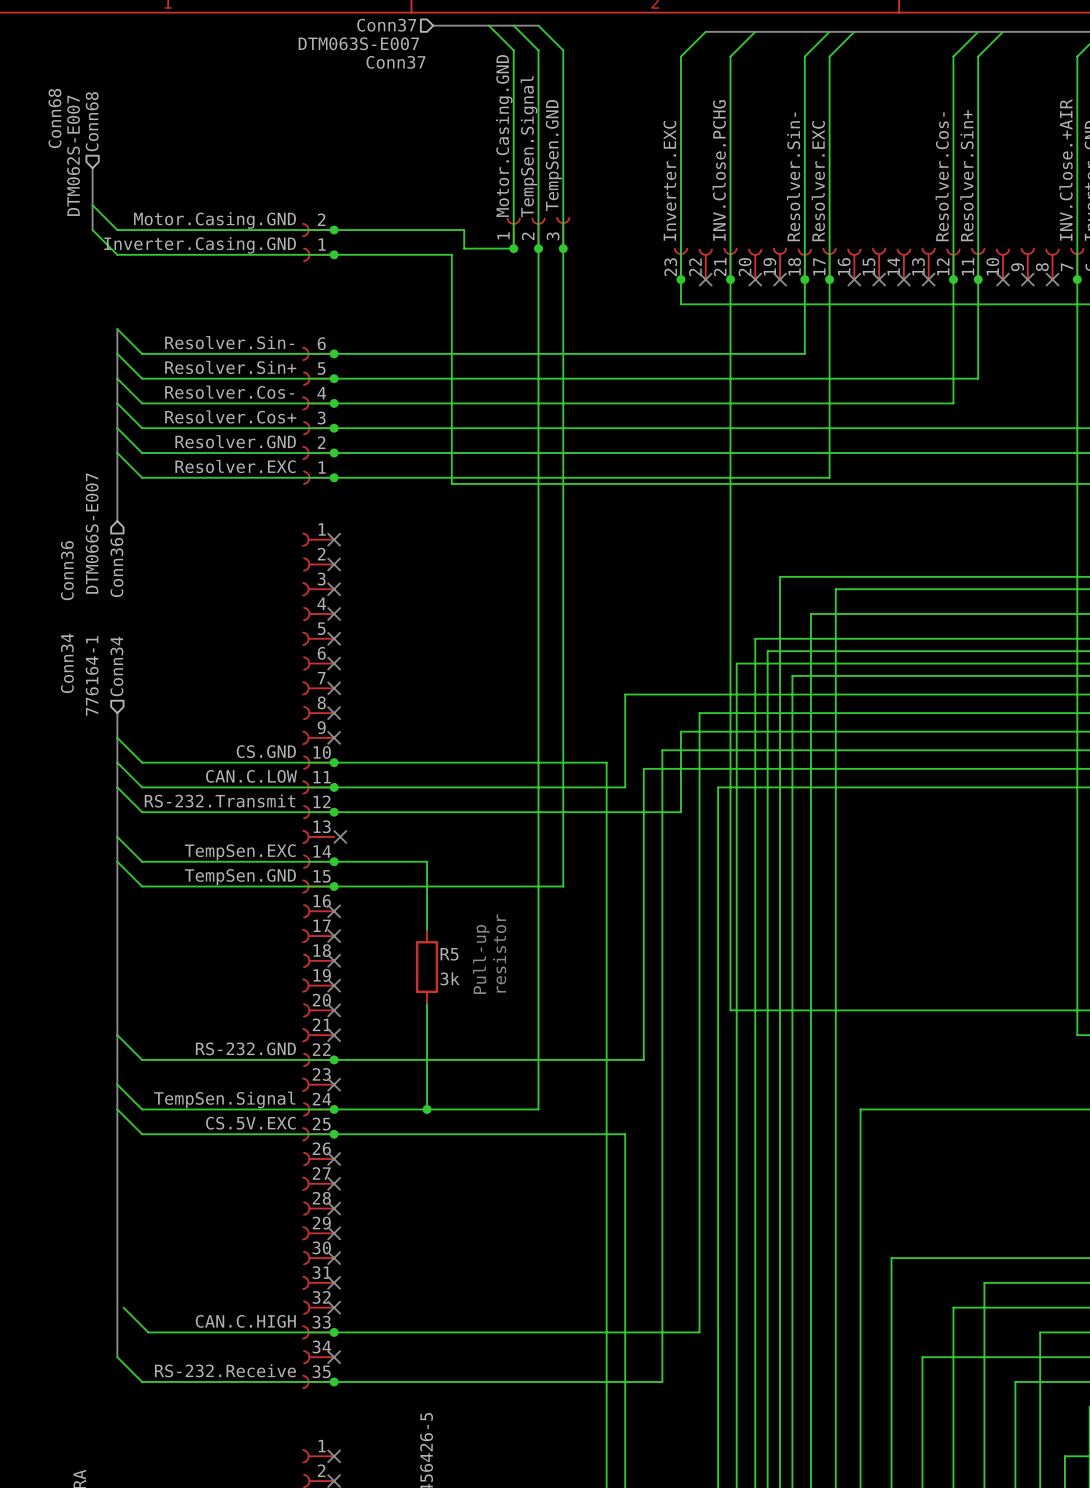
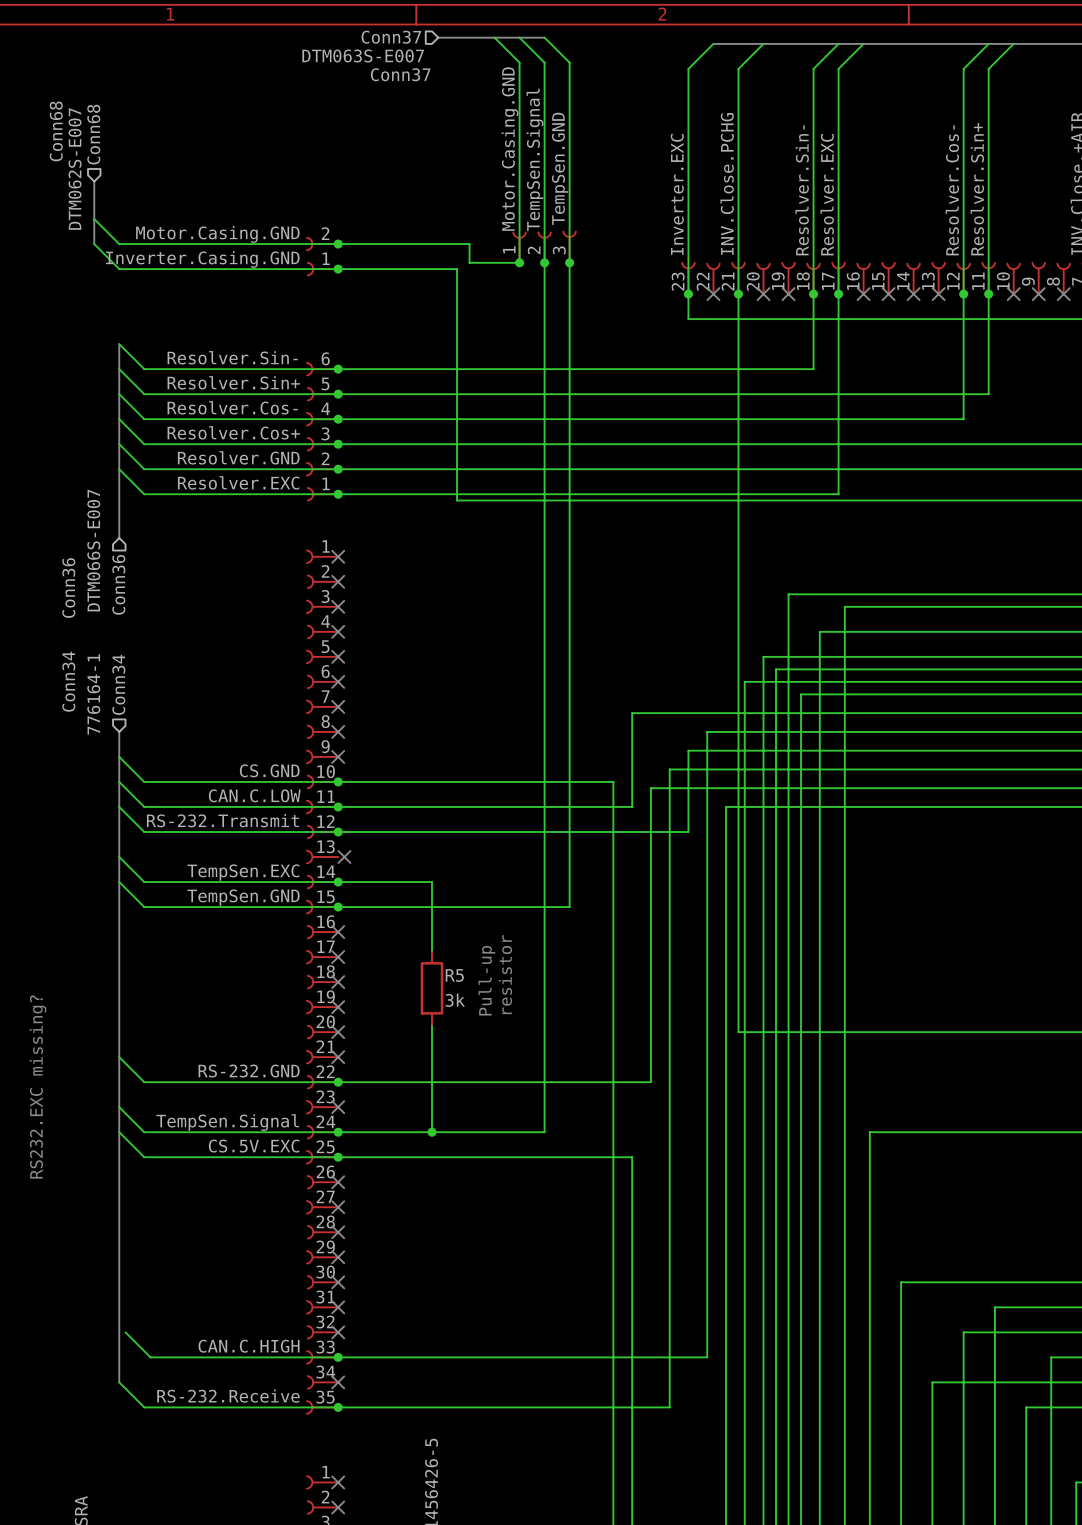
text: none -> RS232.EXC missing? (38, 1087)

